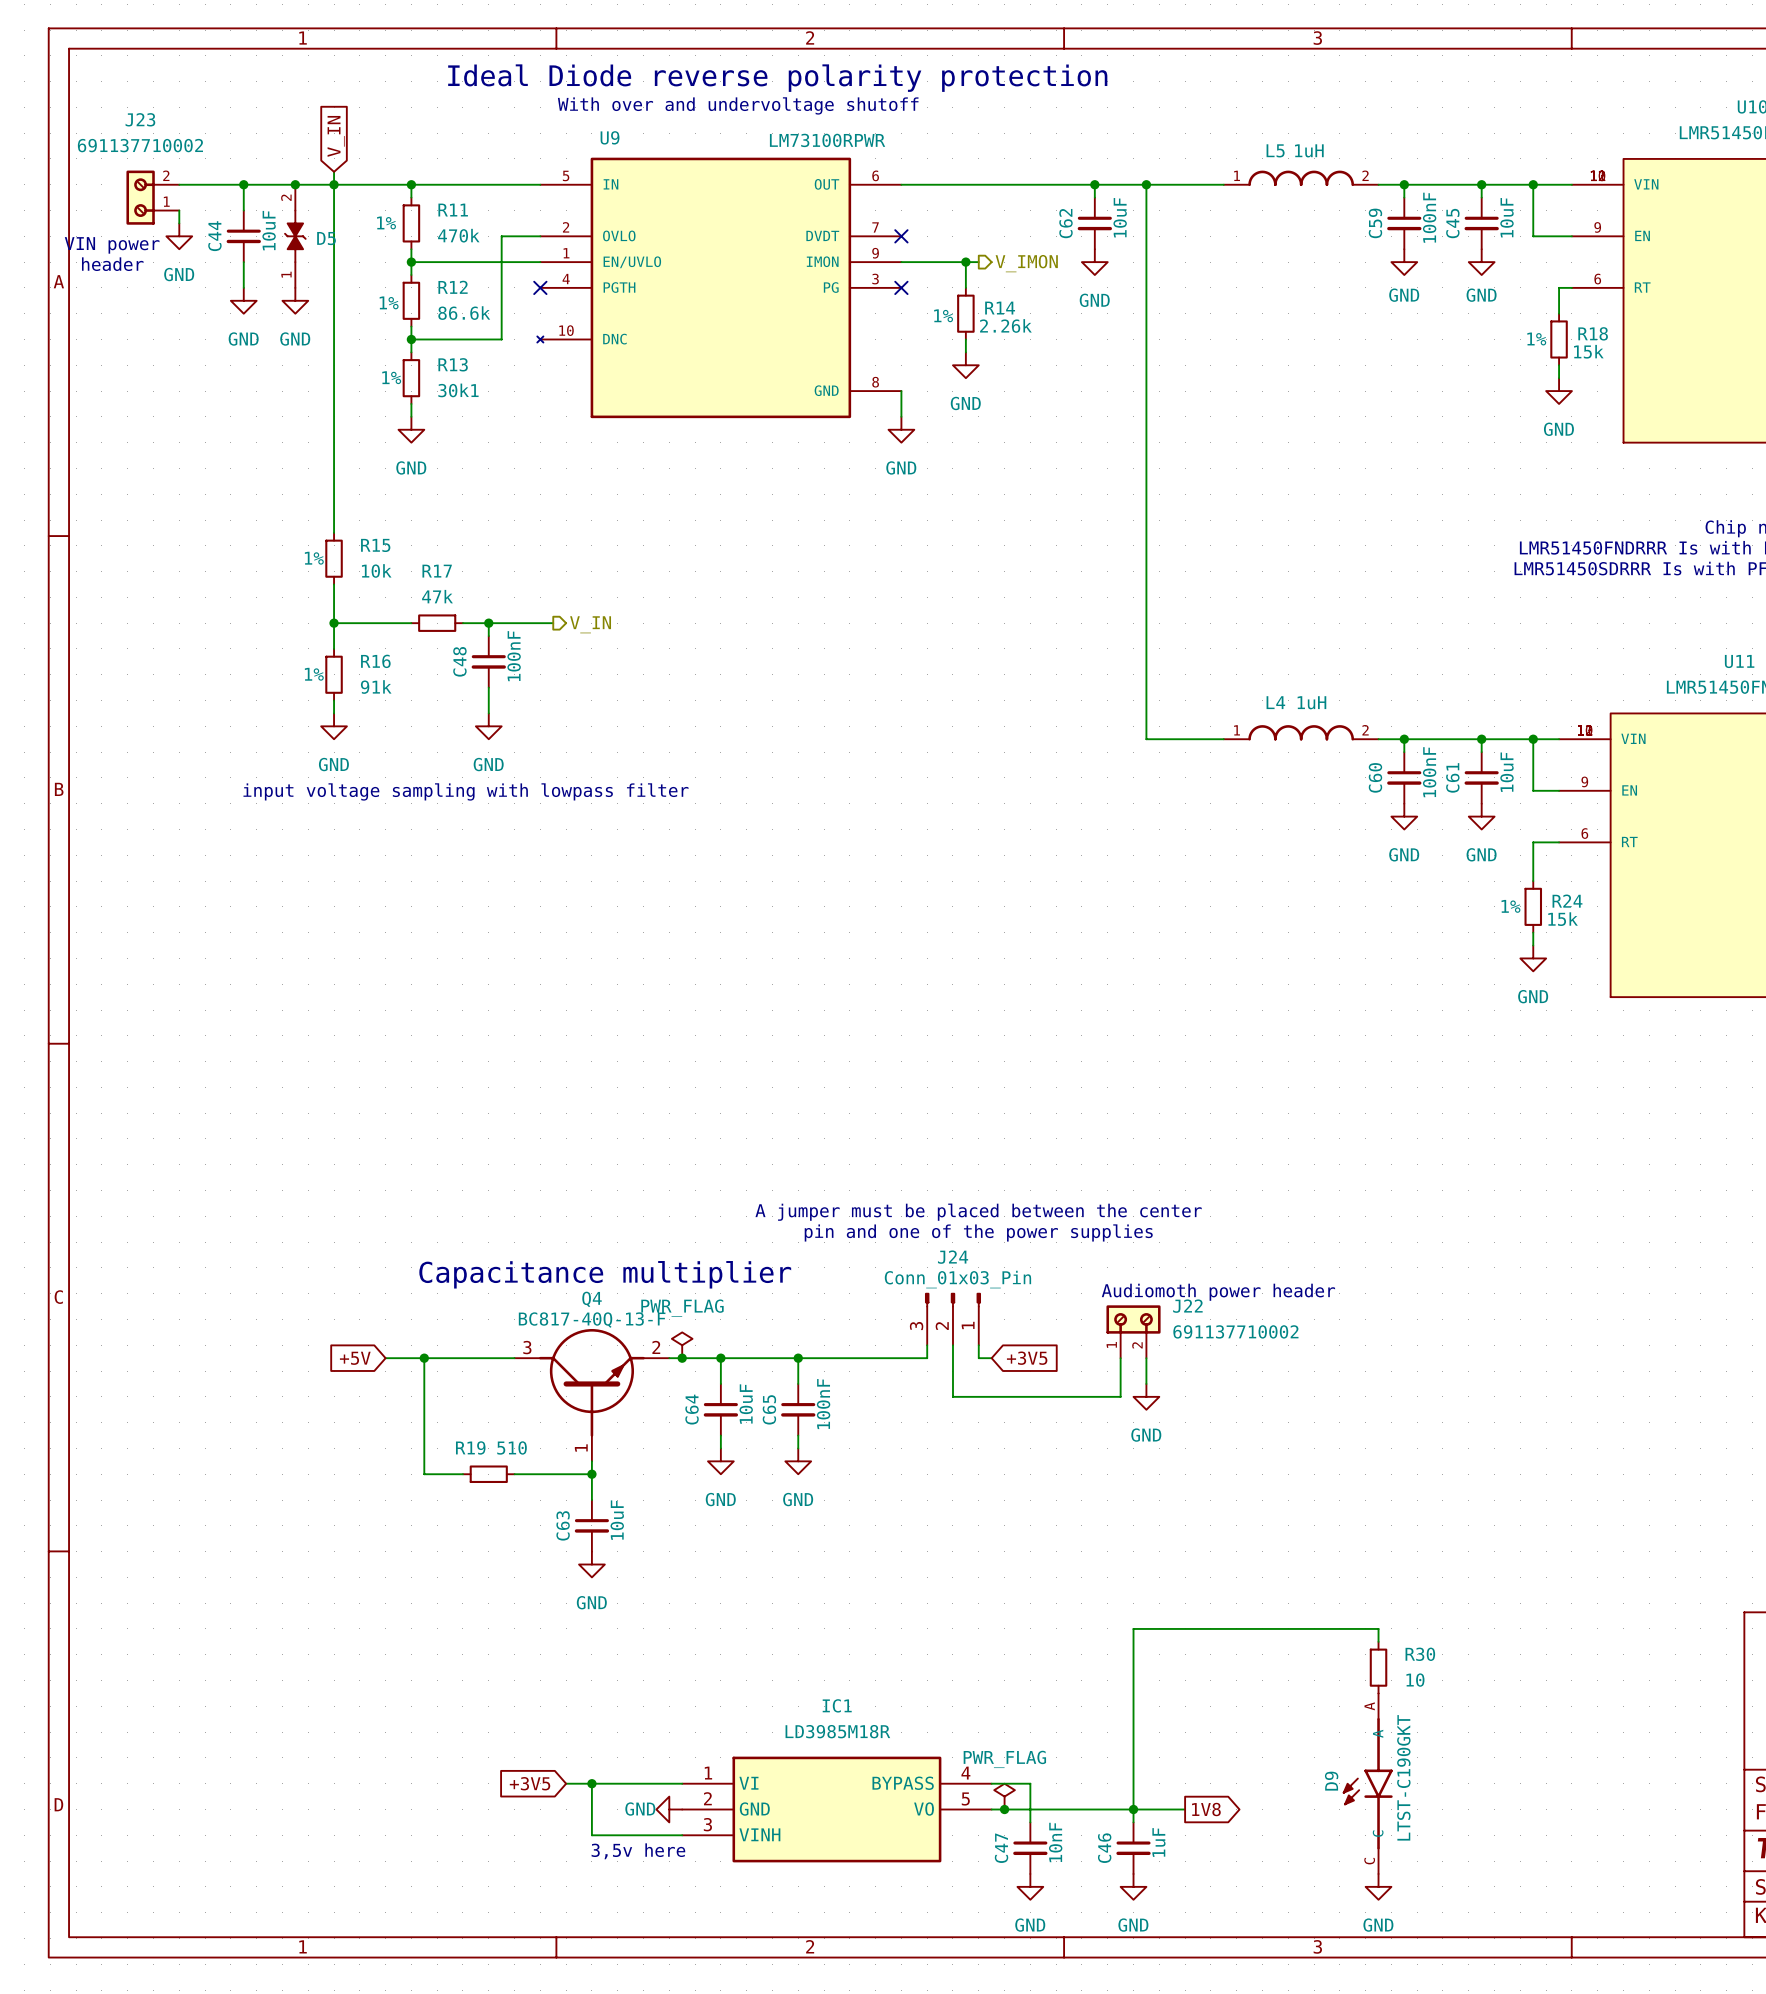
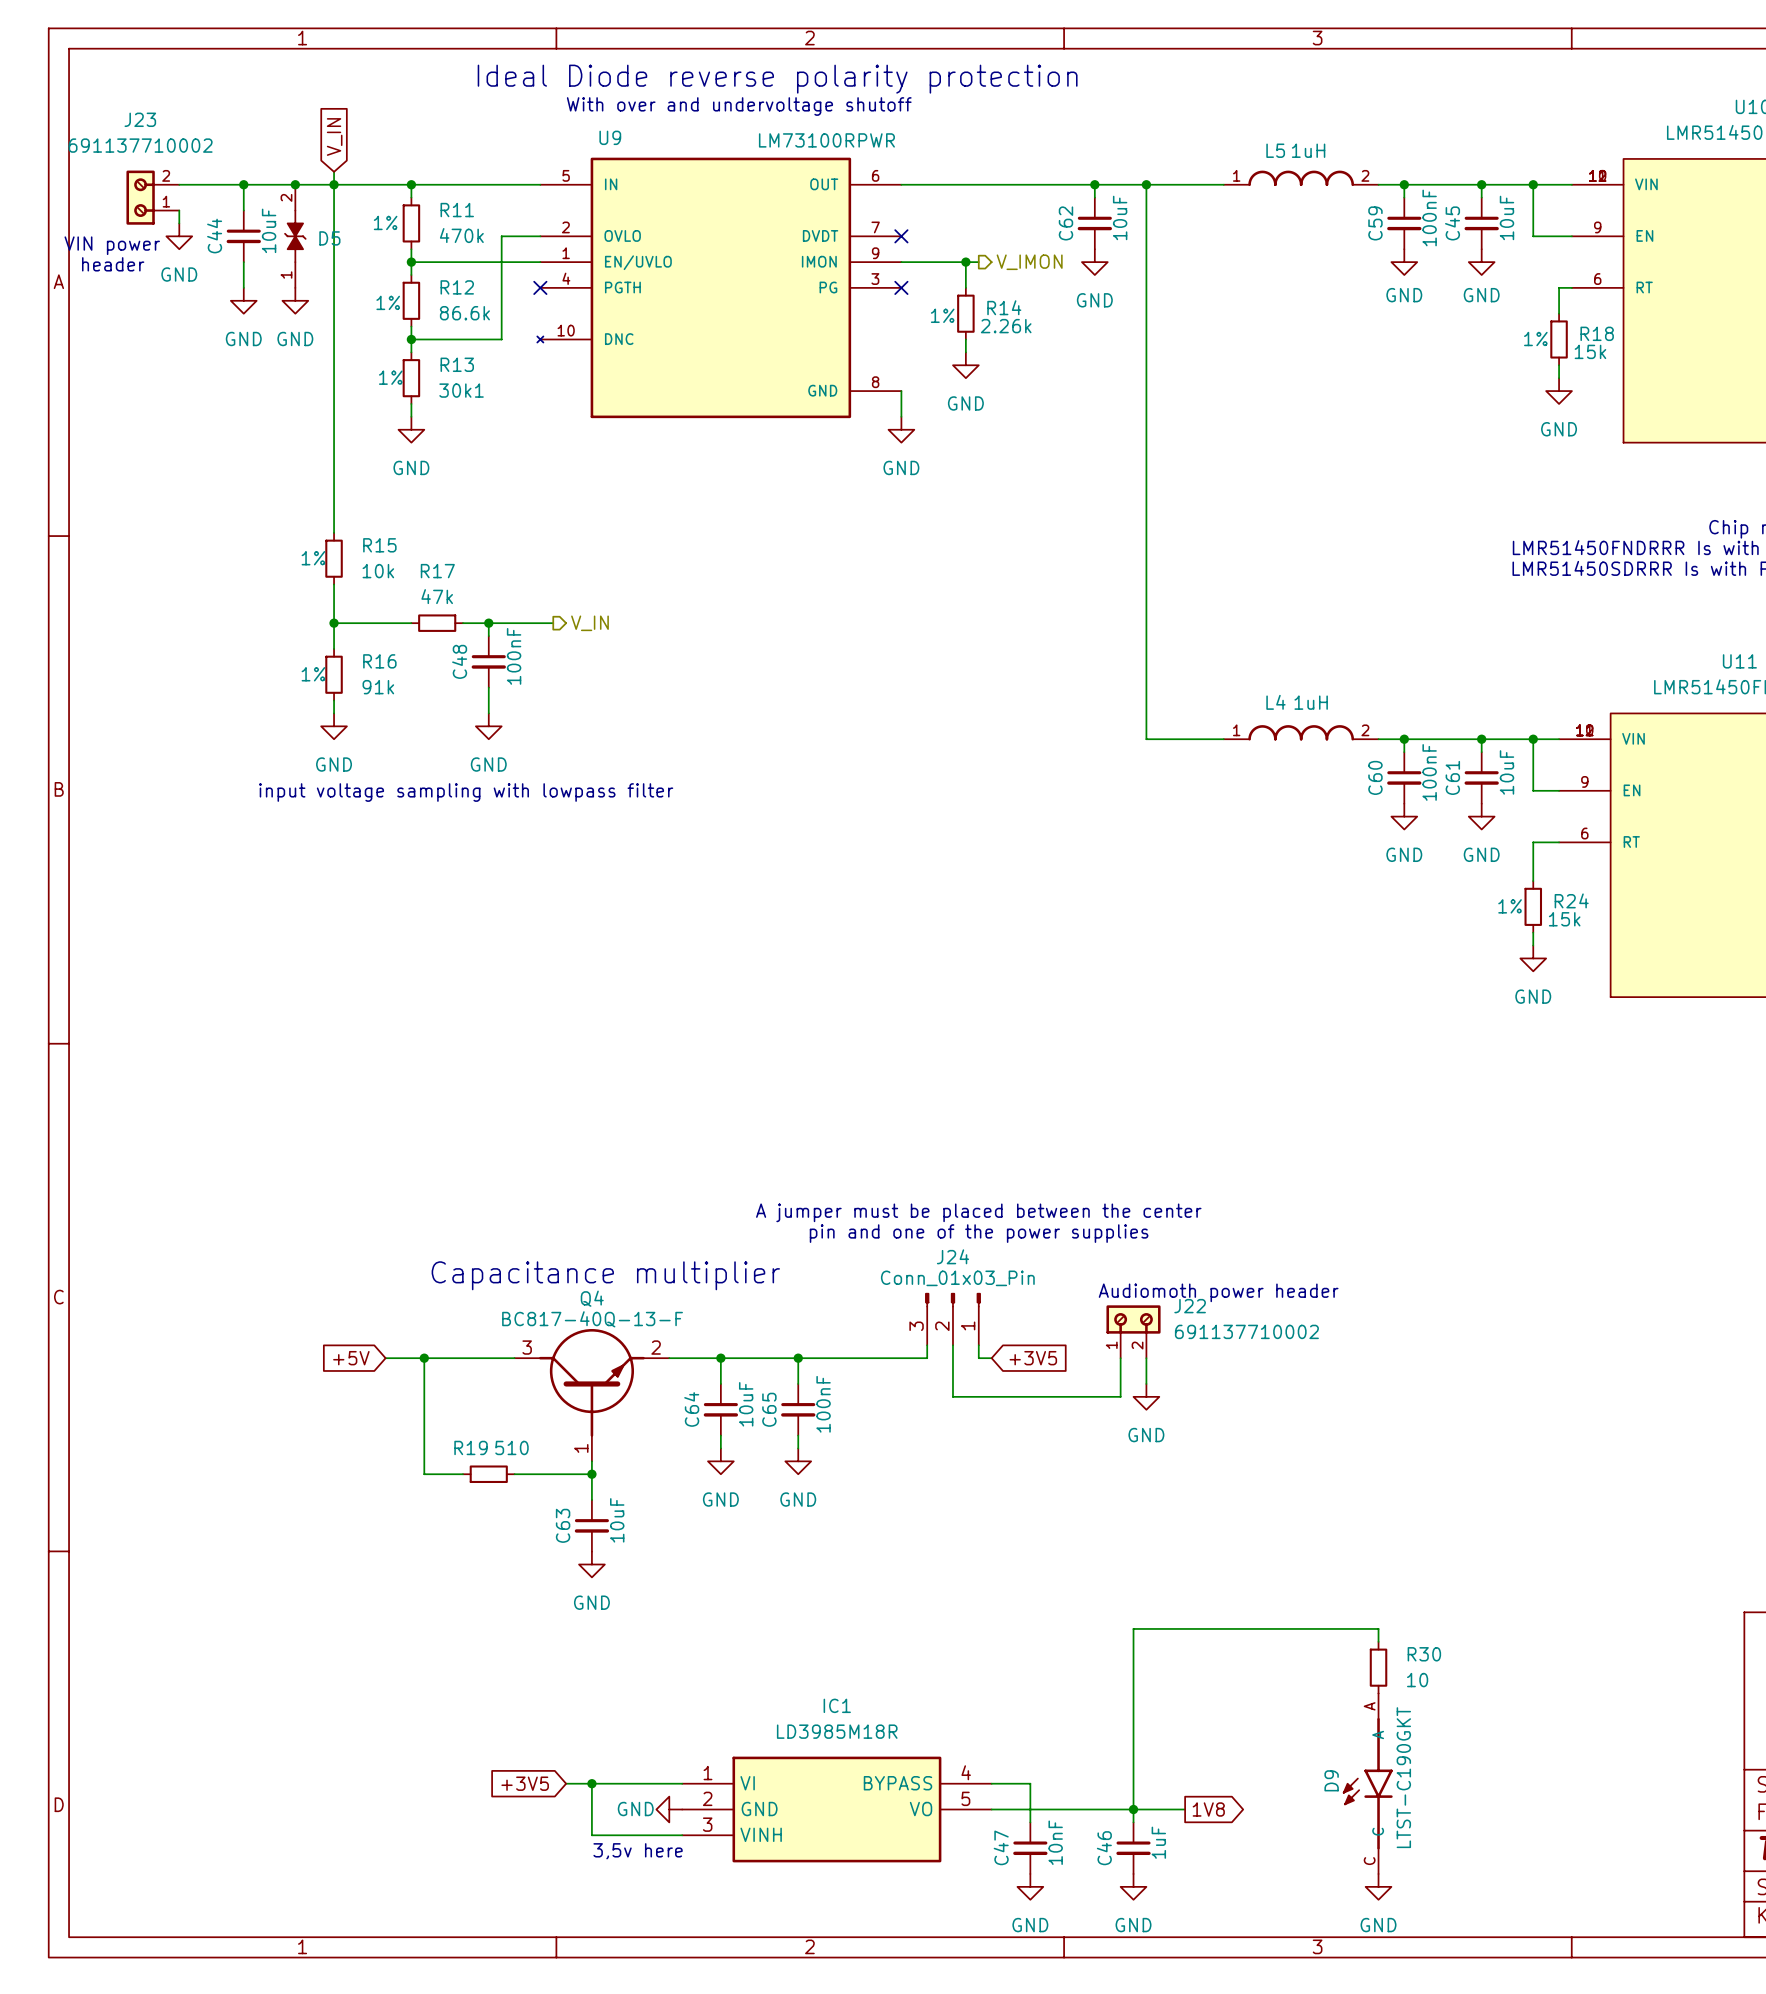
power symbol: PWR_FLAG (682, 1345) -> none
junction: (682, 1358) -> none
power symbol: PWR_FLAG (1004, 1796) -> none
junction: (1004, 1809) -> none

